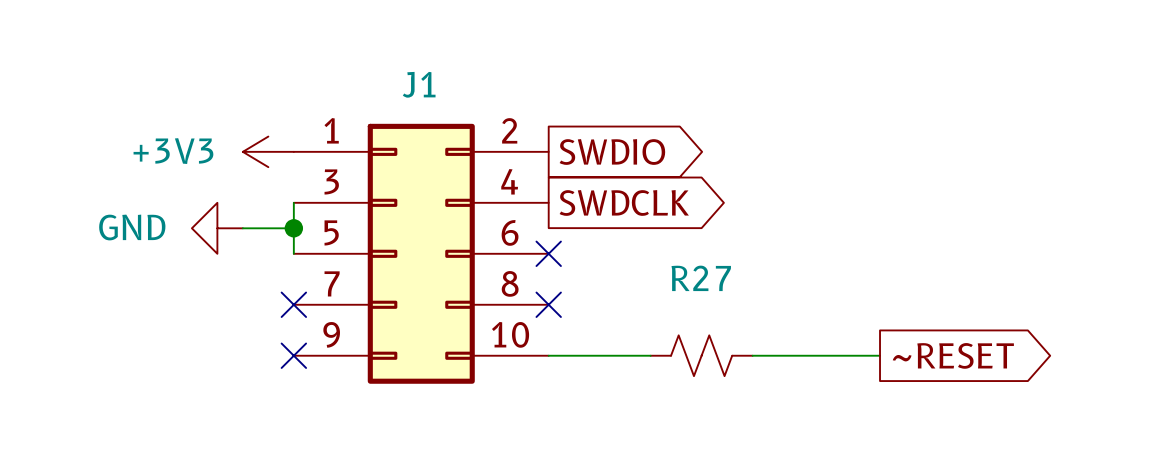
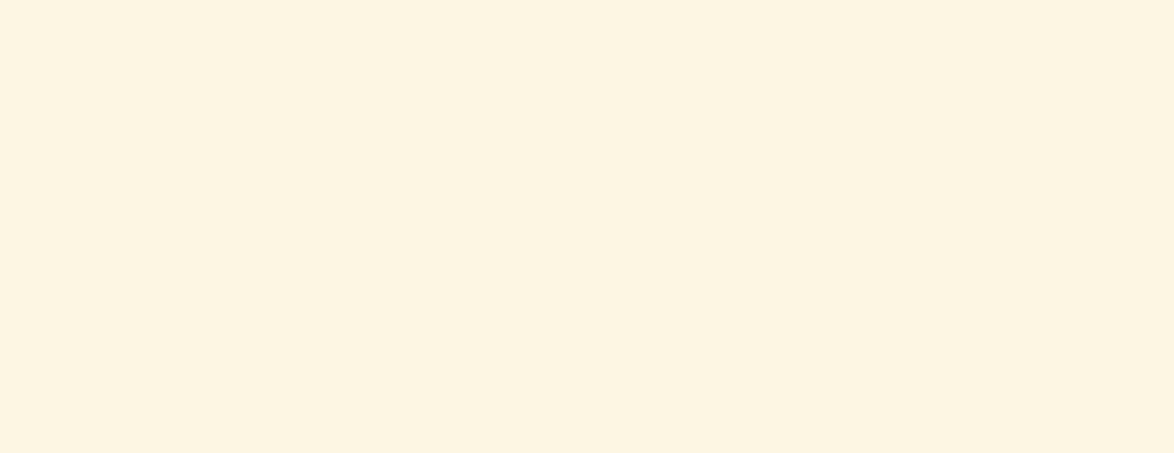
power symbol: +3V3 (268, 151) -> none
global label: SWDIO (612, 151) -> none
wire: (293, 202) (293, 253) -> none
global label: SWDCLK (624, 202) -> none
power symbol: GND (217, 228) -> none
wire: (242, 228) (293, 228) -> none
junction: (293, 228) -> none
J1: (421, 253) -> none
no-connect mark: (548, 253) -> none
no-connect mark: (293, 304) -> none
no-connect mark: (548, 304) -> none
no-connect mark: (293, 355) -> none
wire: (548, 355) (650, 355) -> none
R27: (701, 355) -> none
wire: (752, 355) (880, 355) -> none
global label: ~RESET (953, 355) -> none

